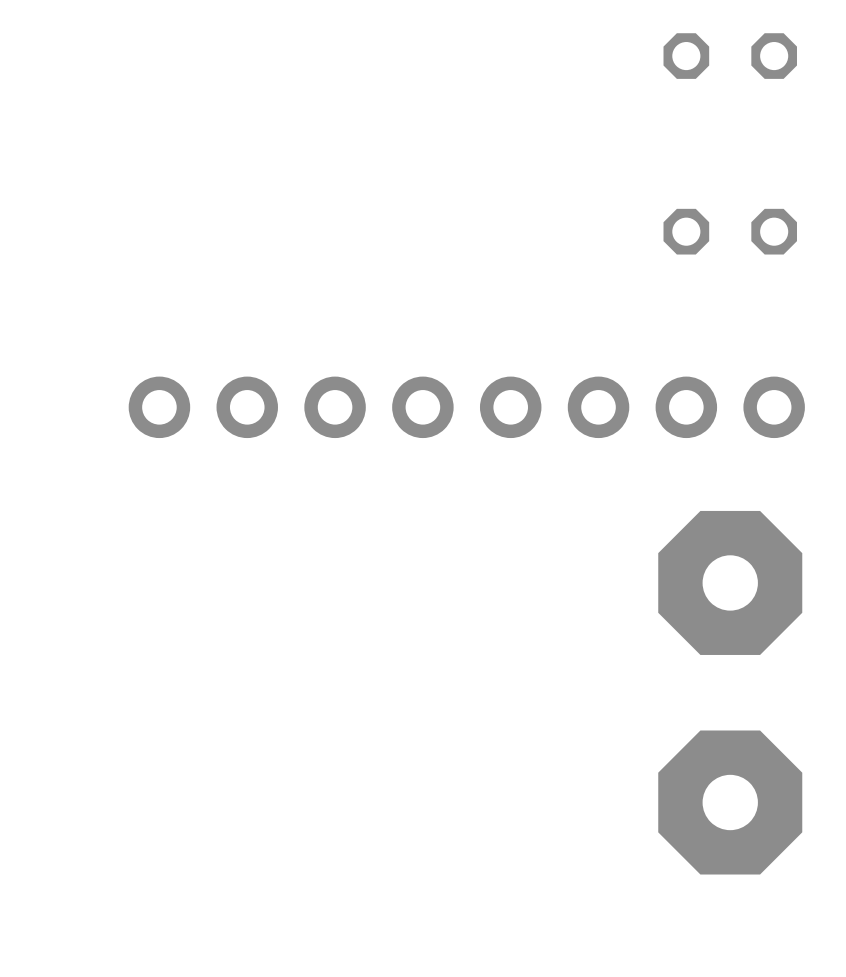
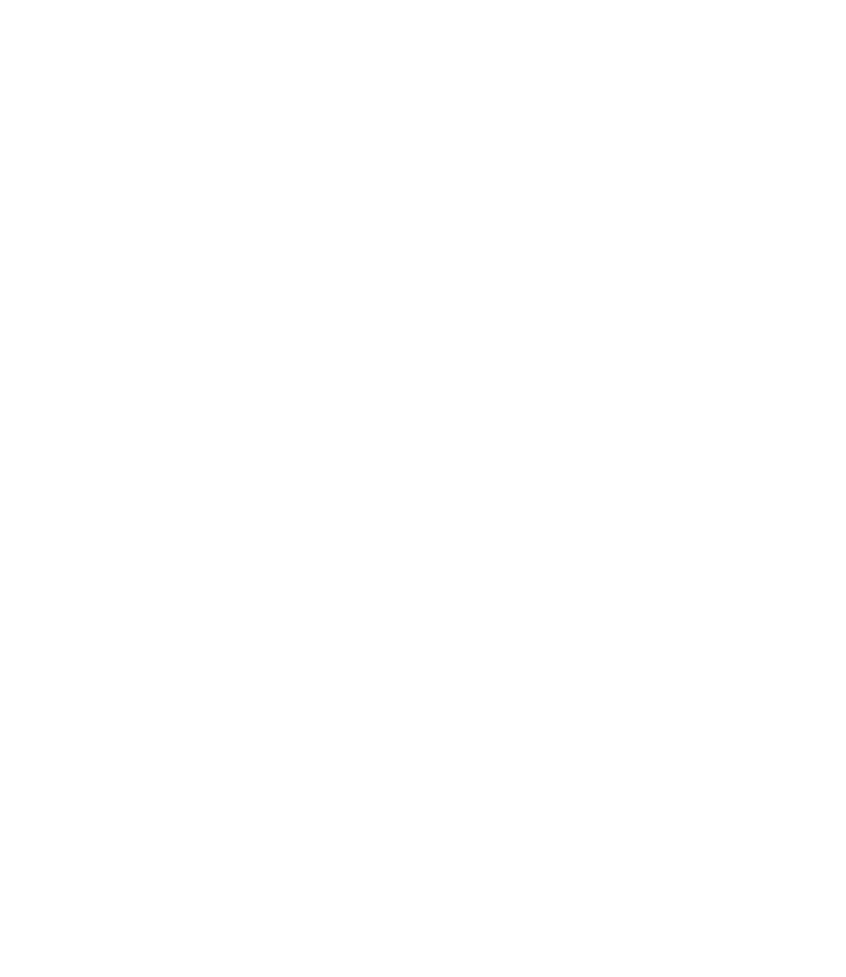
part: (730, 56) -> none
part: (730, 231) -> none
part: (466, 407) -> none
part: (730, 582) -> none
part: (730, 802) -> none

